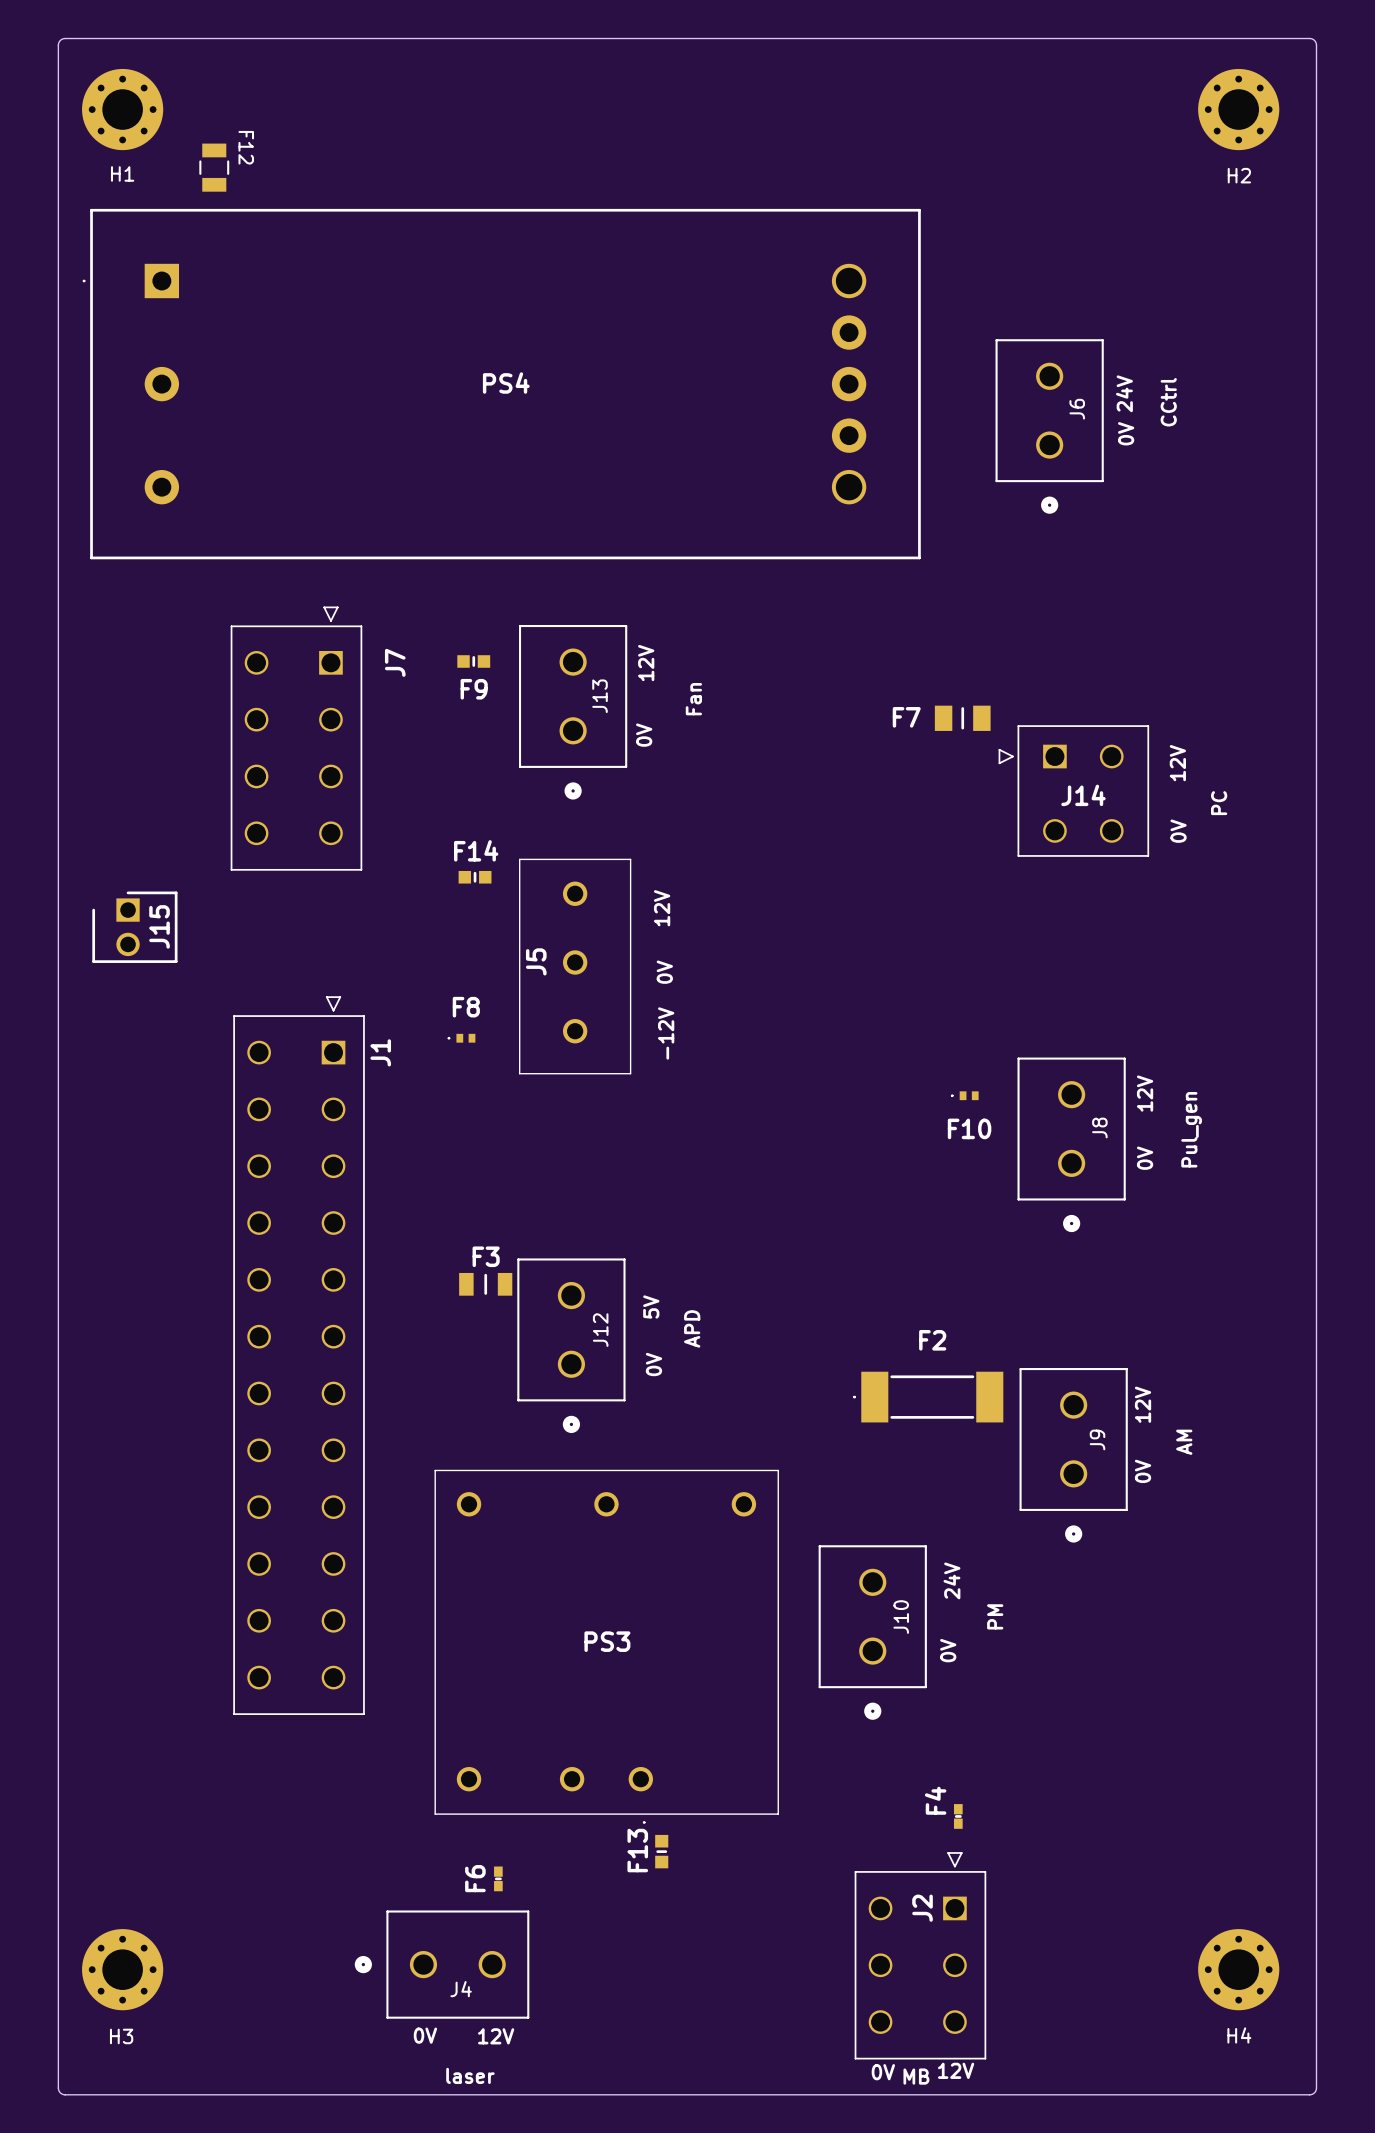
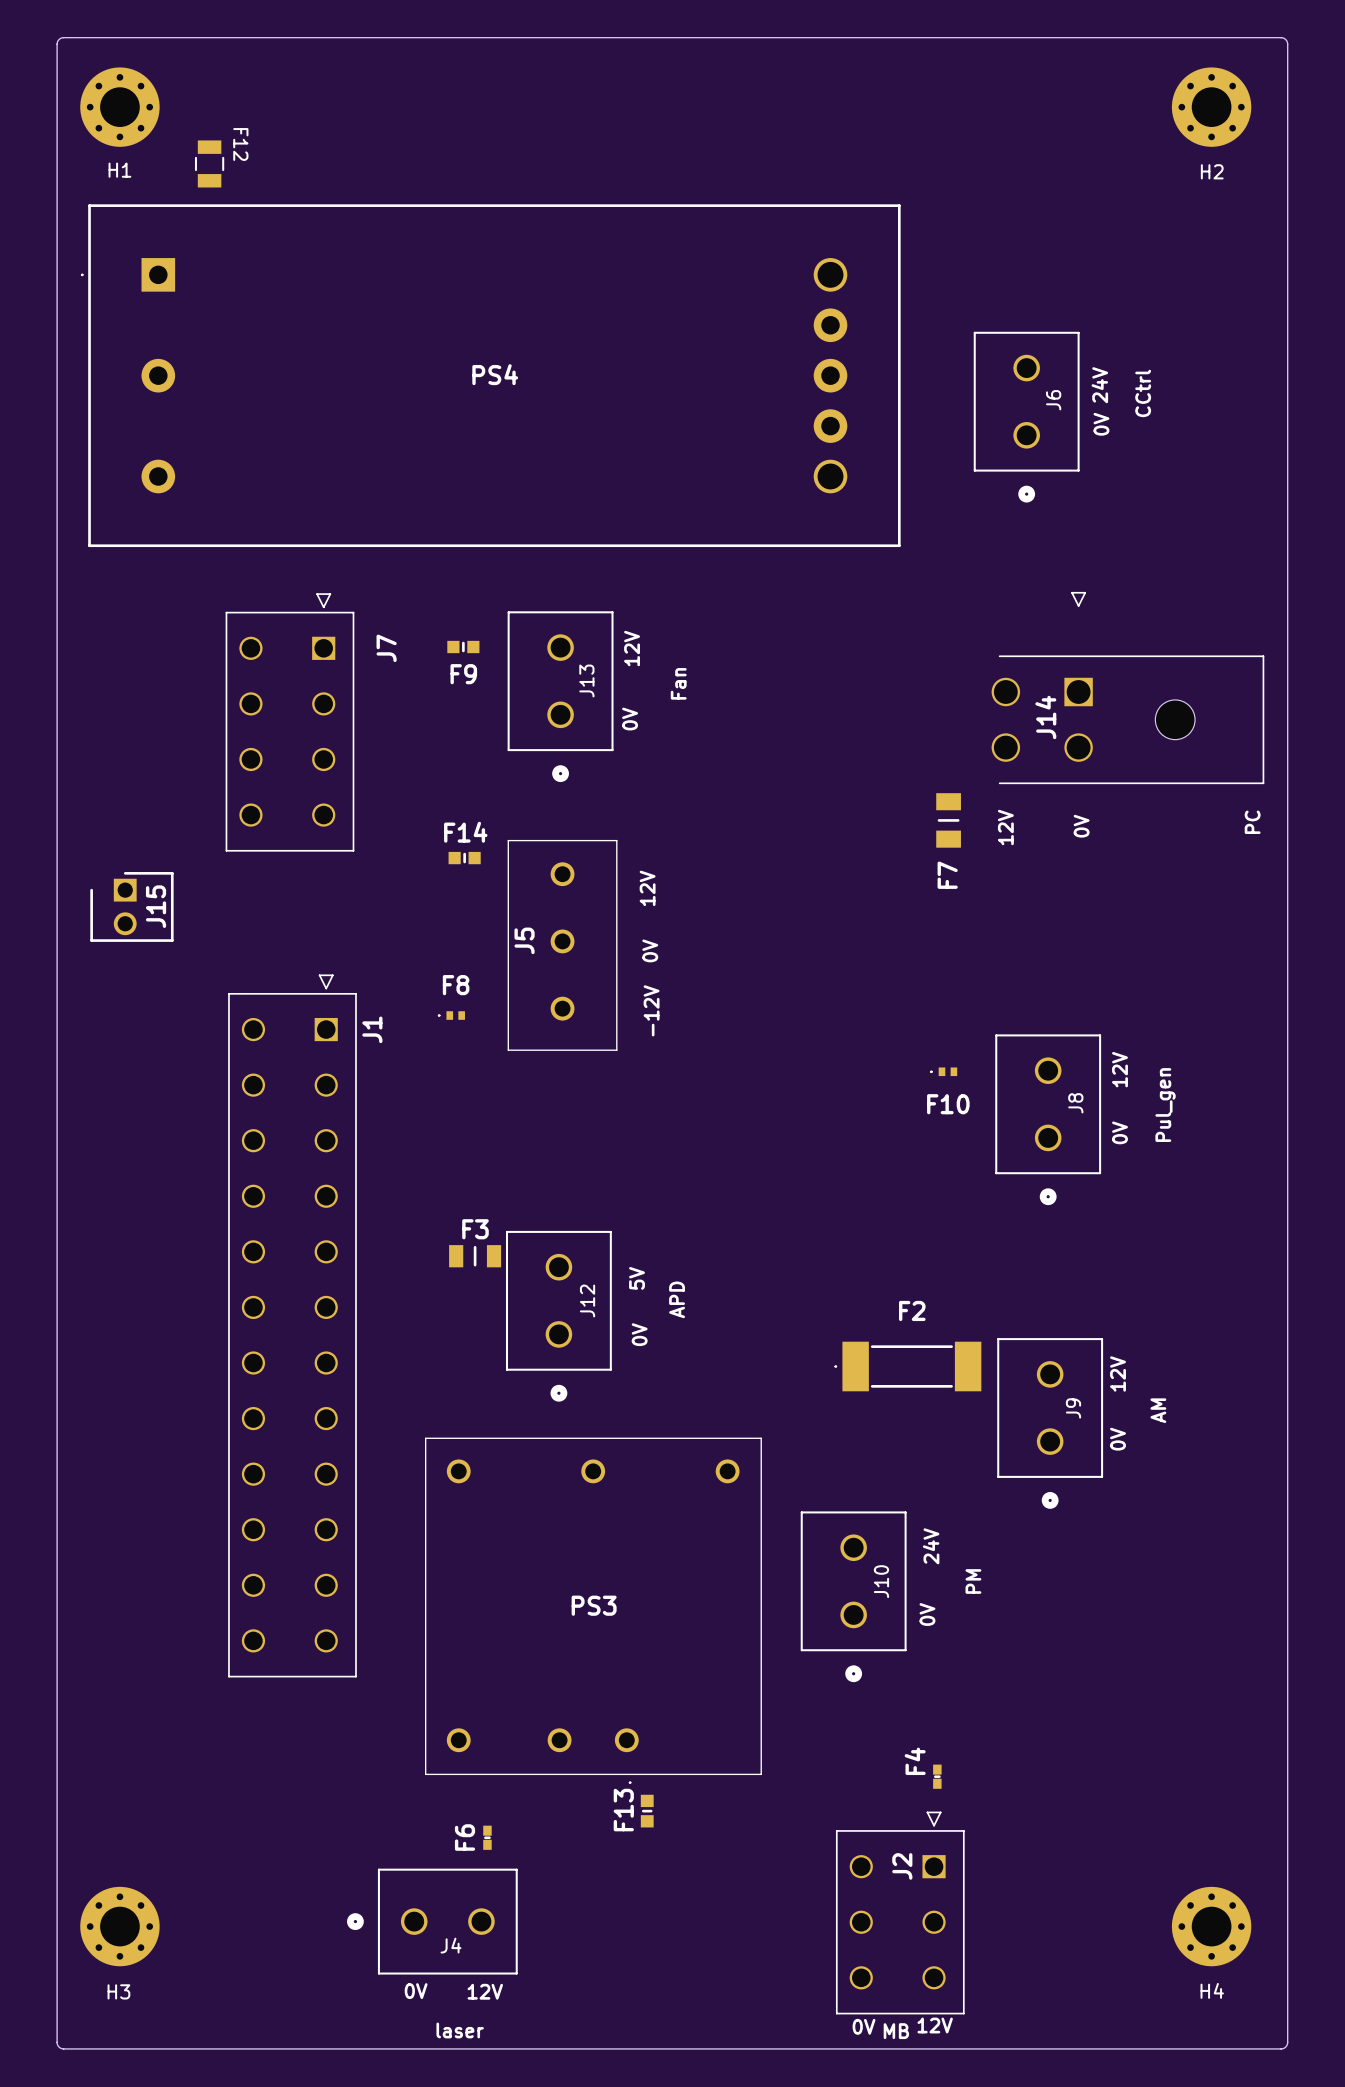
F7 name position: F7 (906, 717) -> F7 (947, 875)
F7 rotation: 0° (962, 718) -> 90° clockwise (948, 820)
F7 position: (962, 718) -> (948, 820)
J14 footprint: [998, 725, 1150, 857] -> [991, 591, 1265, 785]
text position: 12V (1177, 763) -> 12V (1005, 827)
J14 name position: J14 (1083, 795) -> J14 (1045, 717)
text position: PC (1219, 803) -> PC (1252, 822)
text position: 0V (1178, 831) -> 0V (1081, 826)

